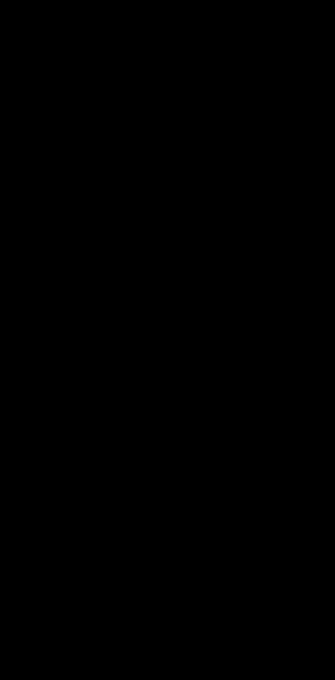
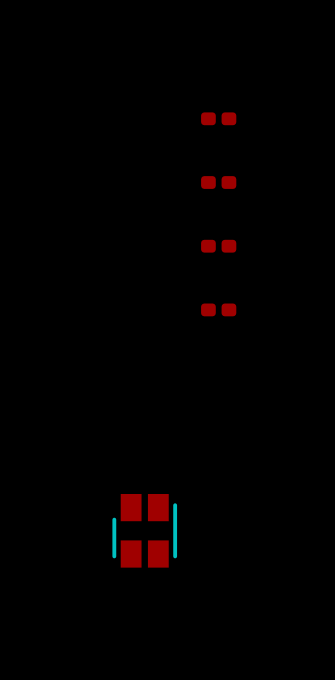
part: none -> (218, 118)
part: none -> (218, 182)
part: none -> (218, 246)
part: none -> (218, 309)
part: none -> (144, 530)

